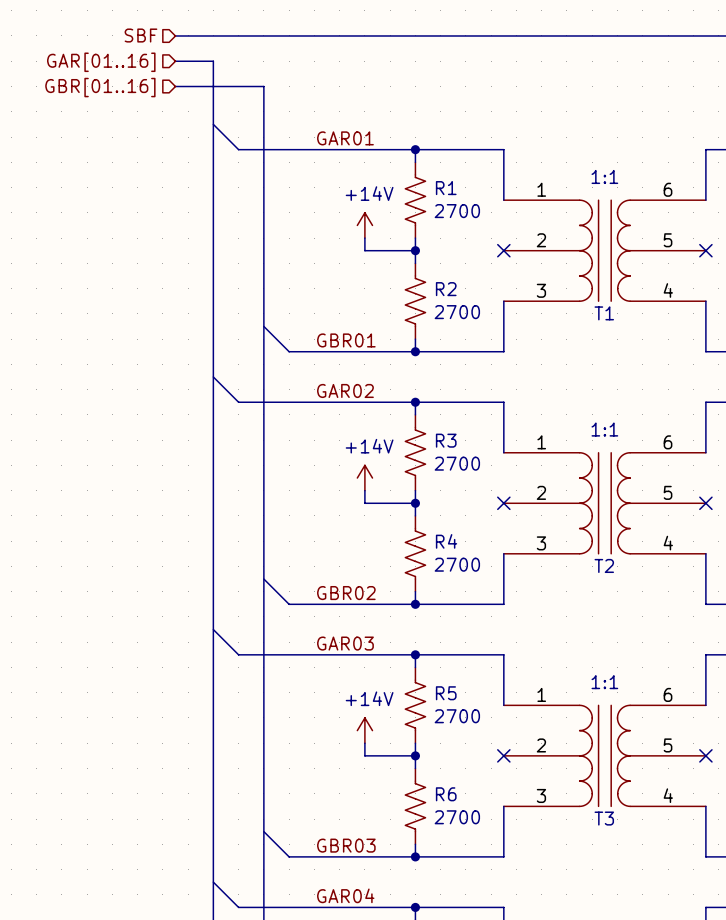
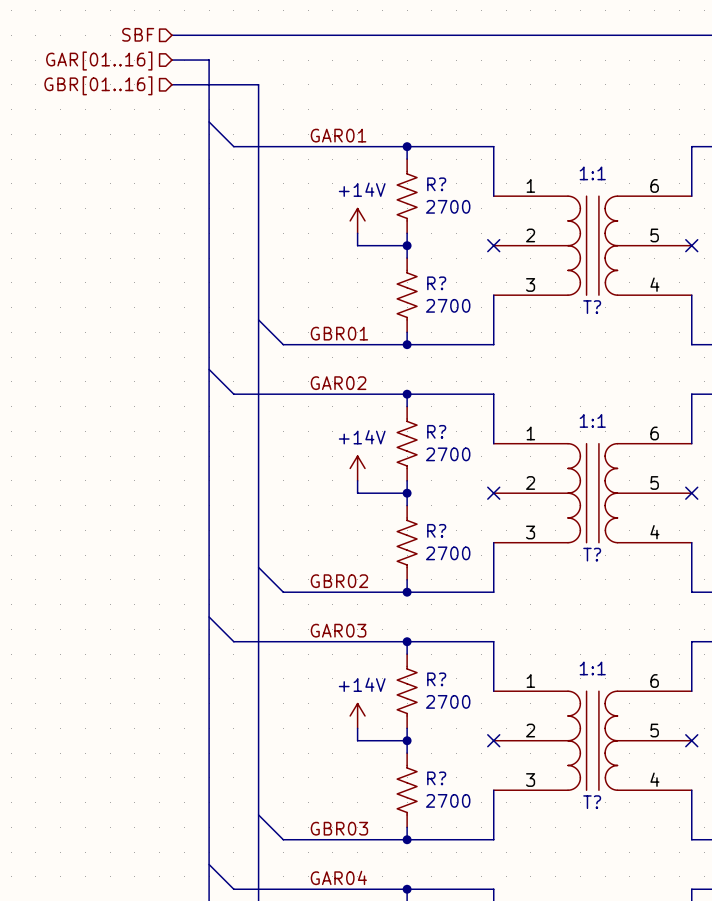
R1 name: R1 (446, 188) -> R? (436, 184)
R2 name: R2 (446, 289) -> R? (436, 283)
T1 name: T1 (604, 313) -> T? (592, 307)
R3 name: R3 (446, 440) -> R? (436, 431)
R4 name: R4 (446, 541) -> R? (436, 530)
T2 name: T2 (604, 565) -> T? (592, 554)
R5 name: R5 (446, 693) -> R? (436, 679)
R6 name: R6 (446, 794) -> R? (436, 778)
T3 name: T3 (604, 818) -> T? (592, 802)

